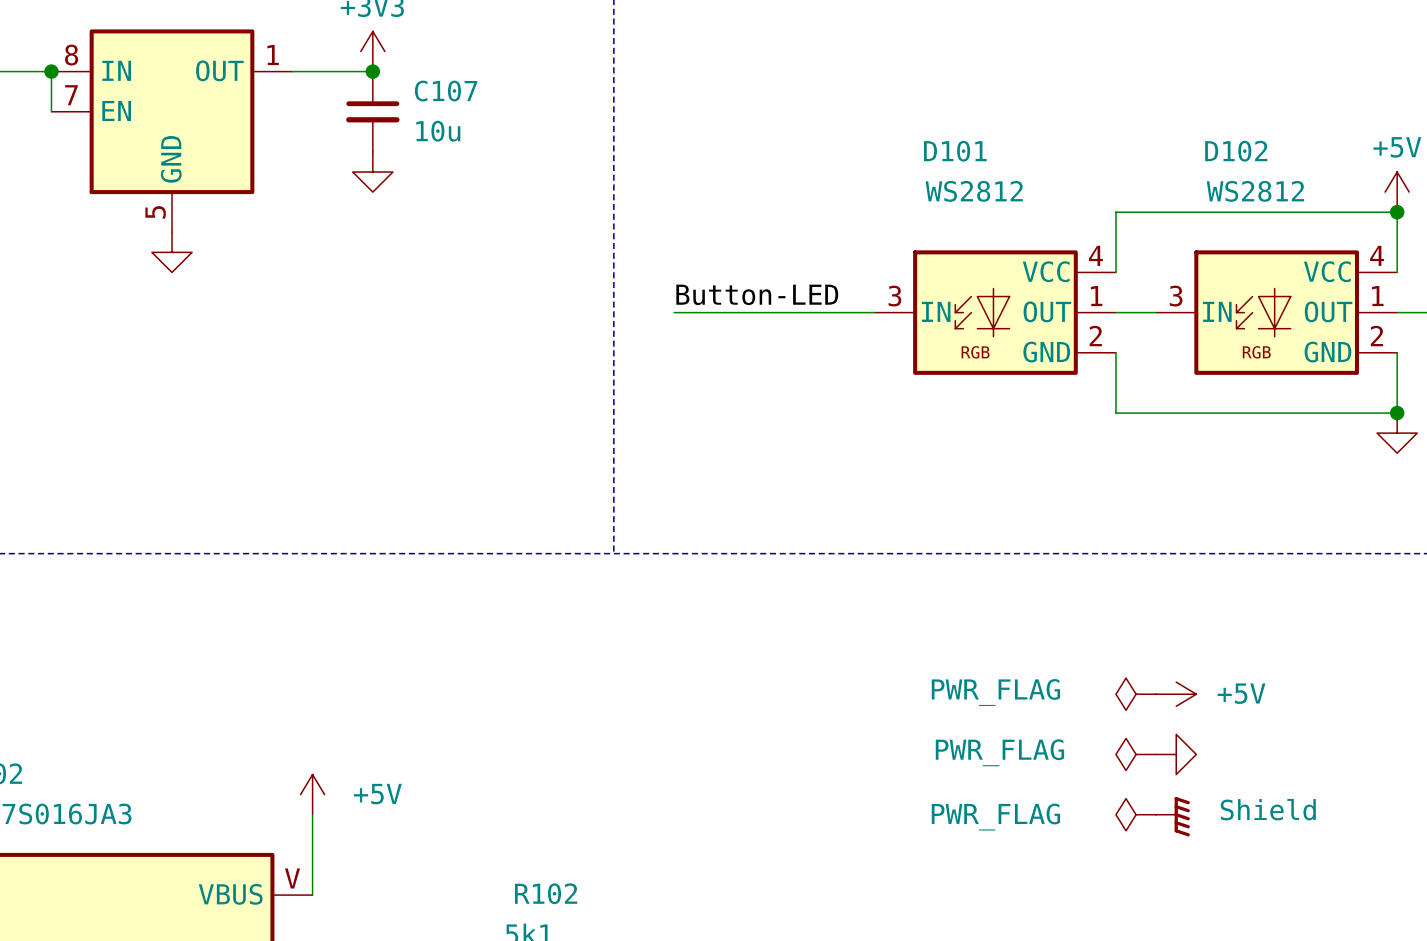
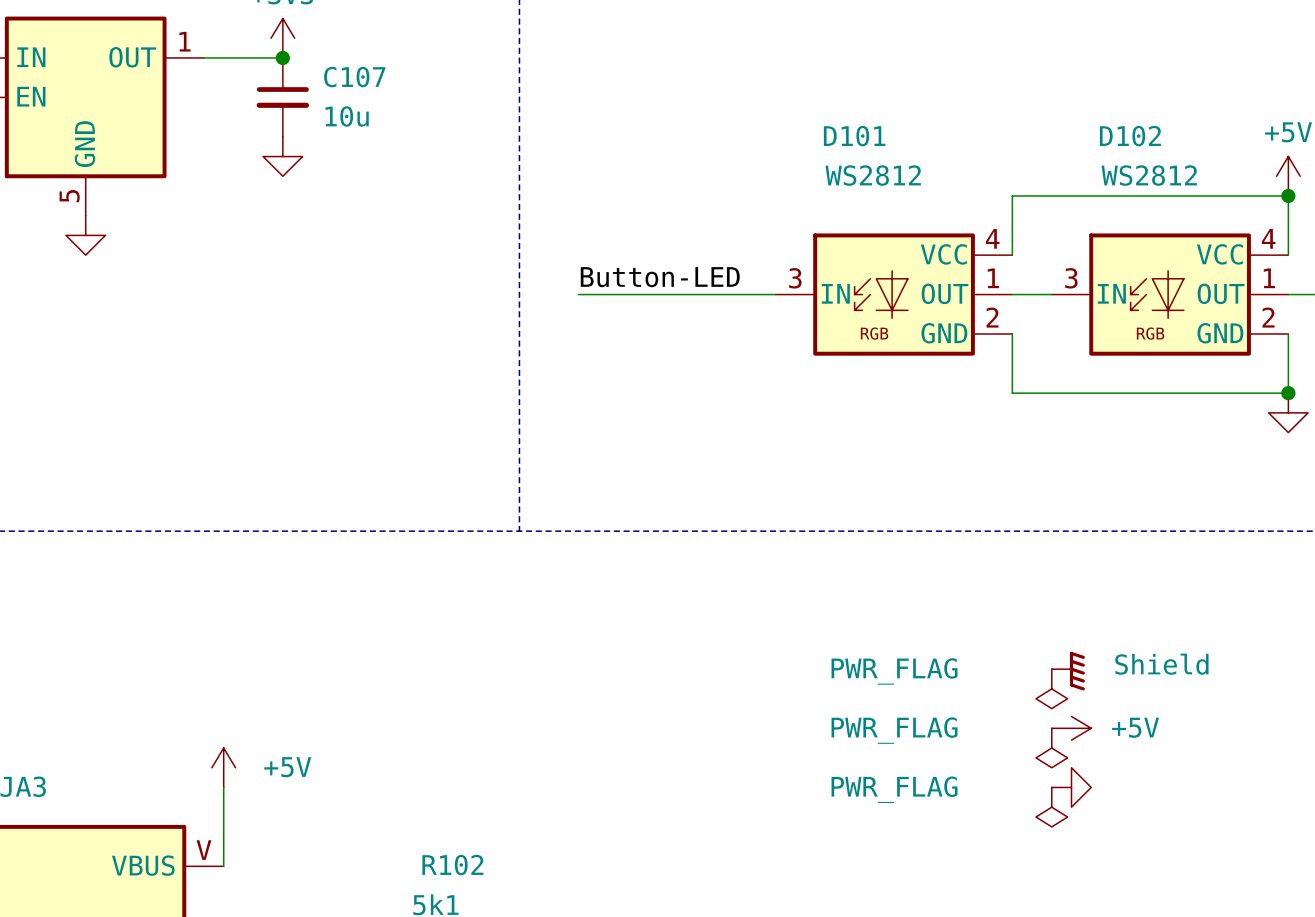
power symbol: PWR_FLAG (1136, 694) -> none
power symbol: +5V (1176, 694) -> Shield (1068, 671)
power symbol: none -> PWR_FLAG (1051, 688)
power symbol shape: [1156, 734, 1197, 775] -> [1051, 716, 1092, 741]
power symbol text: none -> +5V (1135, 727)
power symbol: PWR_FLAG (1136, 754) -> none
power symbol: none -> PWR_FLAG (1051, 748)
power symbol shape: [1156, 797, 1190, 837] -> [1051, 767, 1092, 808]
power symbol text: Shield (1268, 809) -> none
power symbol: PWR_FLAG (1136, 814) -> none
power symbol: none -> PWR_FLAG (1051, 807)

